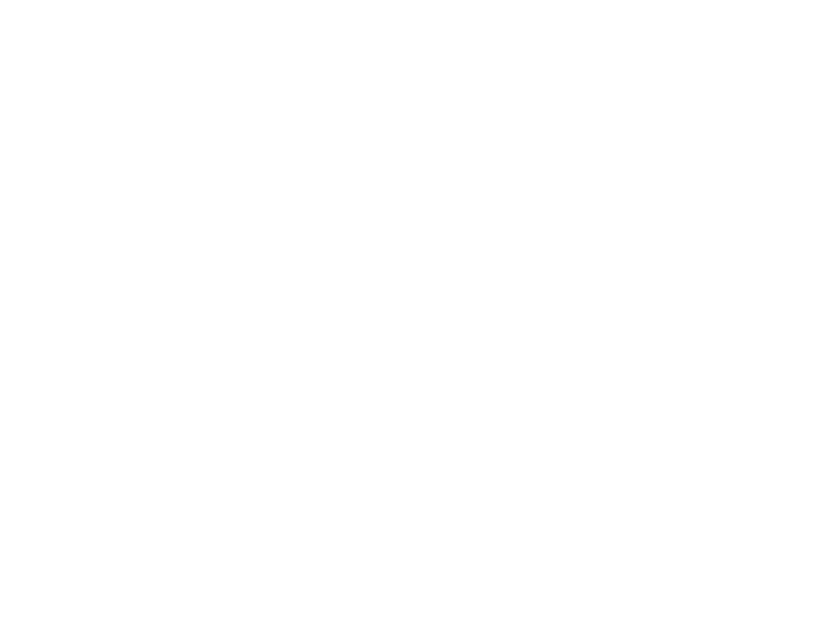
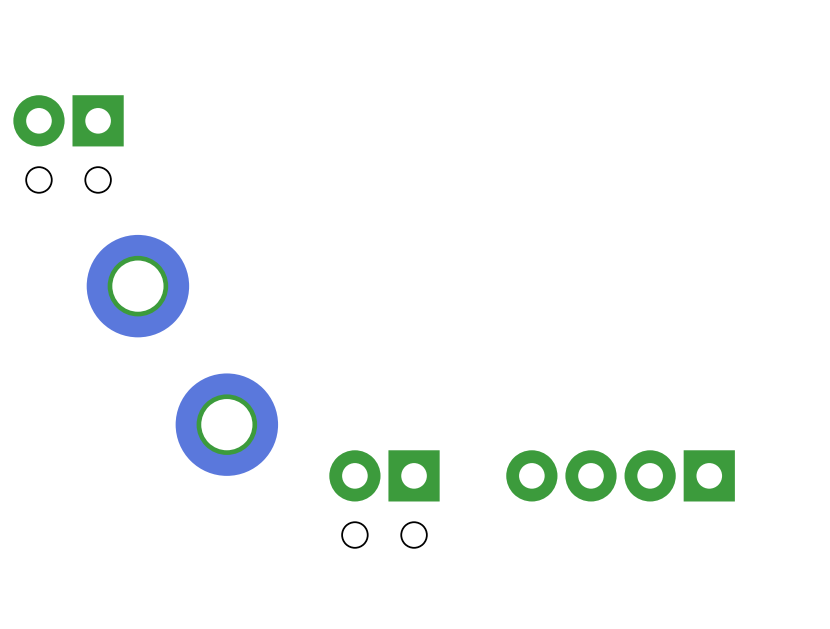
part: none -> (68, 143)
part: none -> (137, 286)
part: none -> (226, 424)
part: none -> (620, 475)
part: none -> (384, 499)

